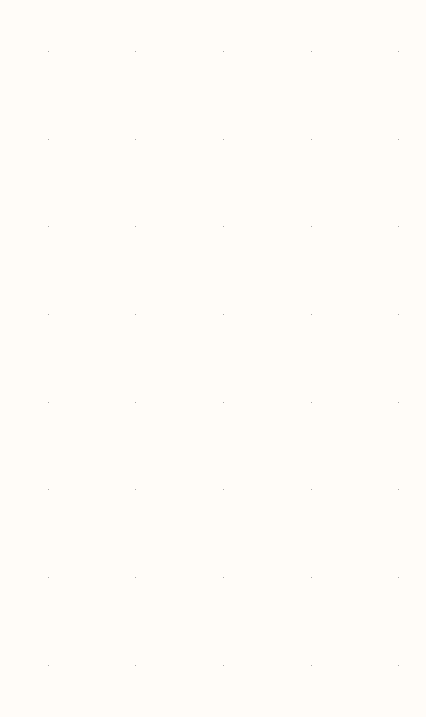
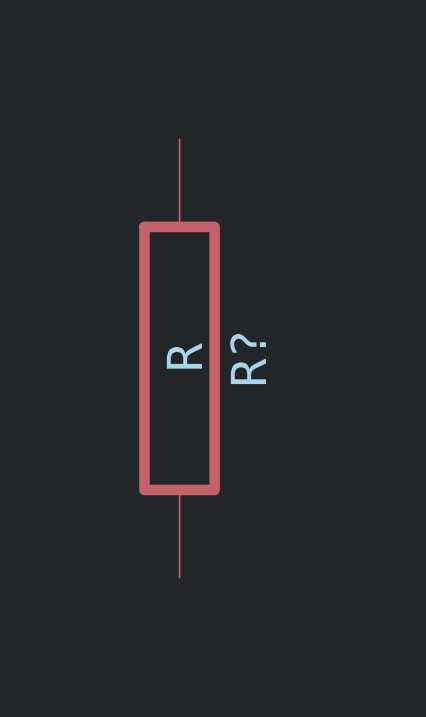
R?: none -> R (179, 358)

